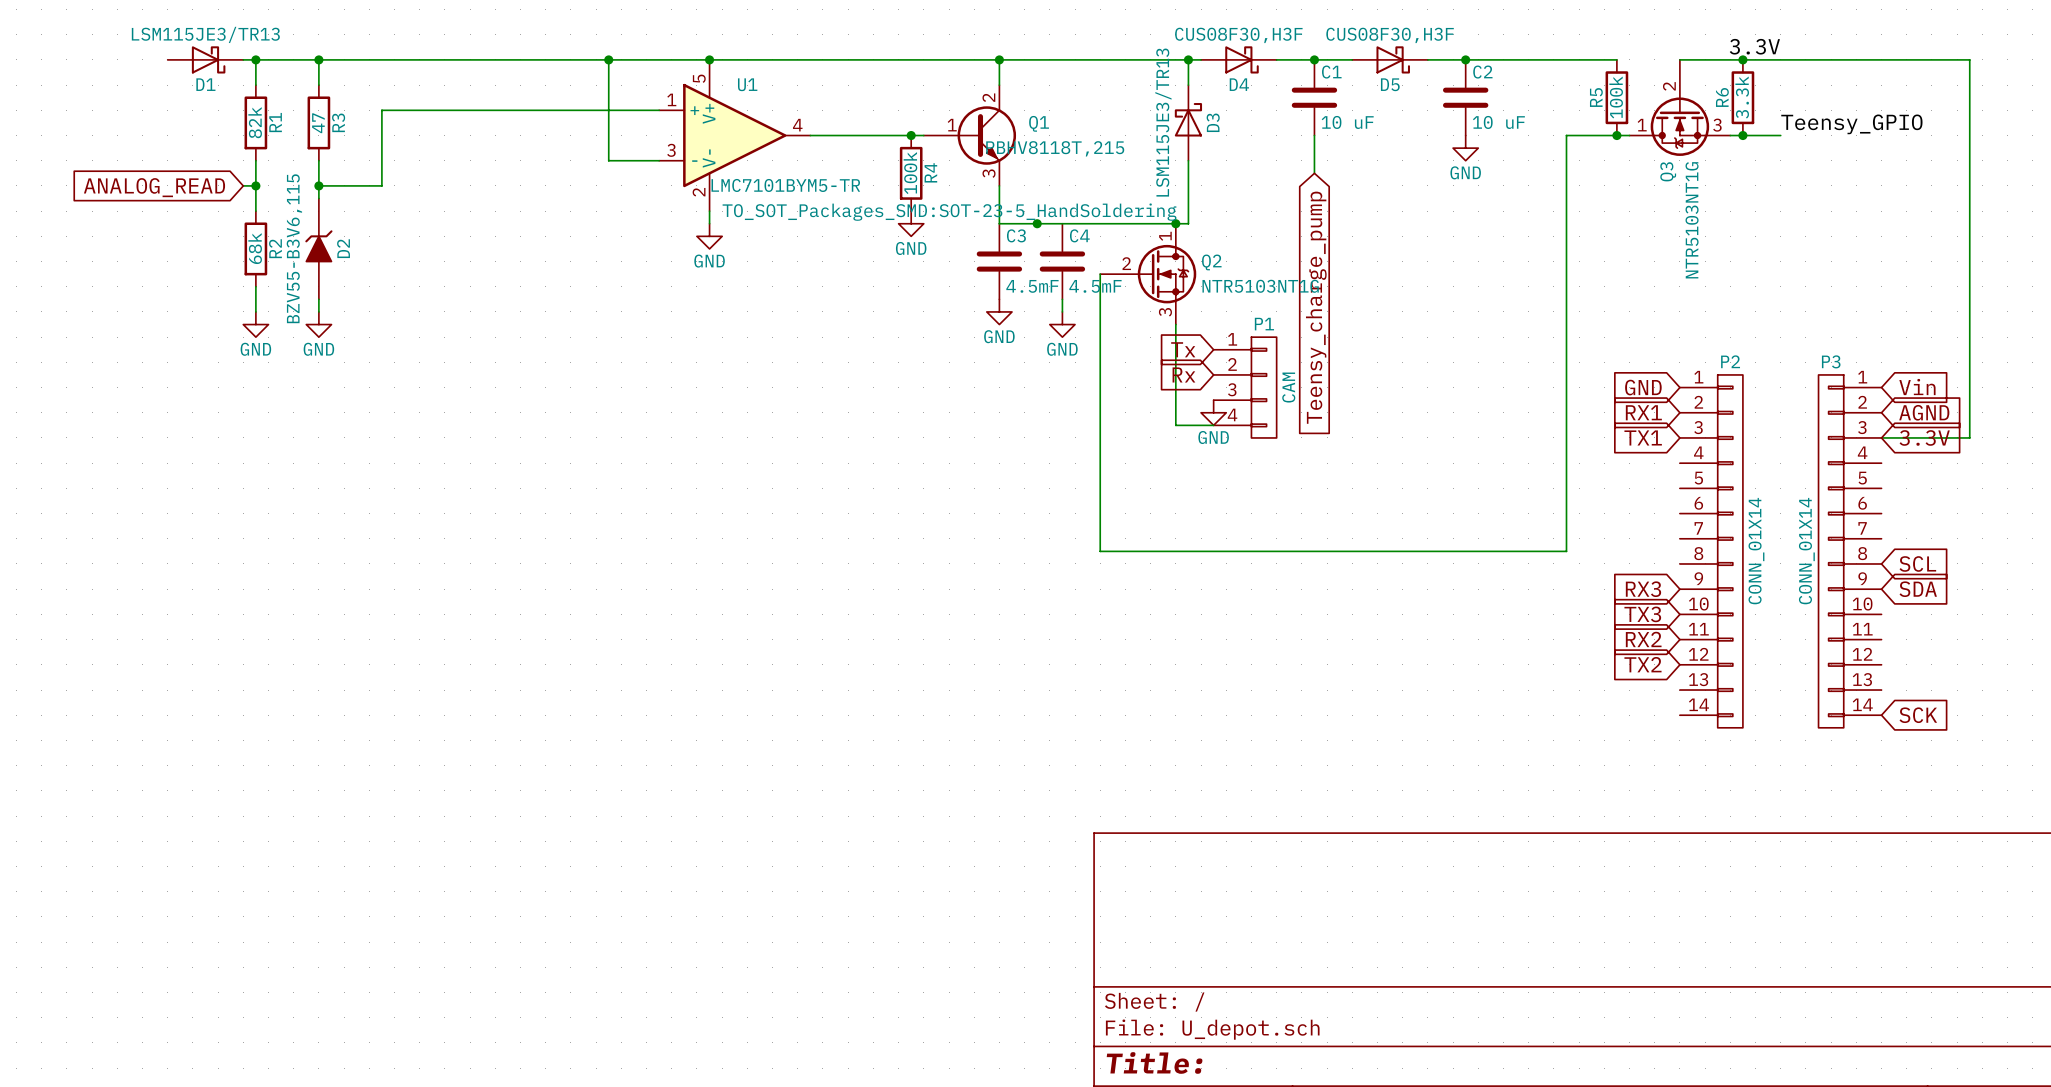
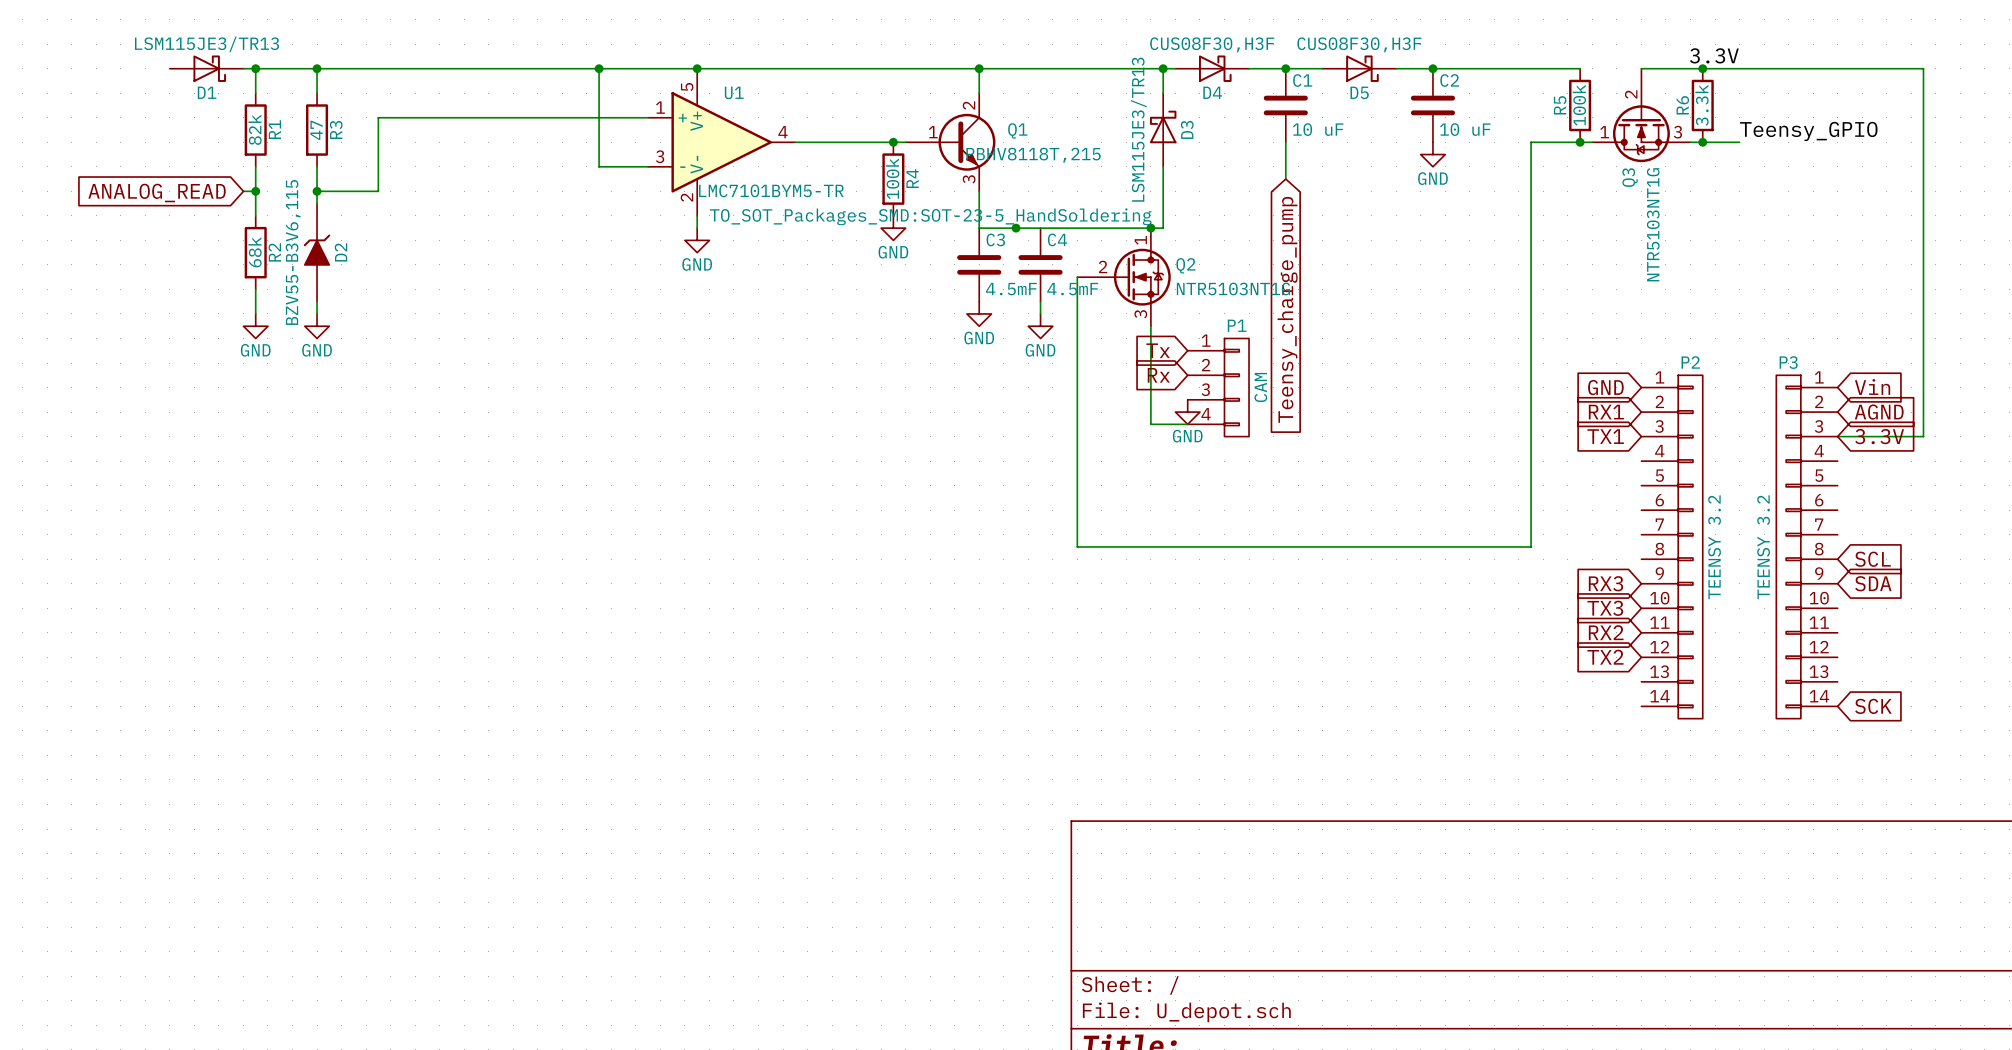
P2 value: CONN_01X14 (1756, 551) -> TEENSY 3.2 (1714, 547)
P3 value: CONN_01X14 (1806, 551) -> TEENSY 3.2 (1763, 547)

